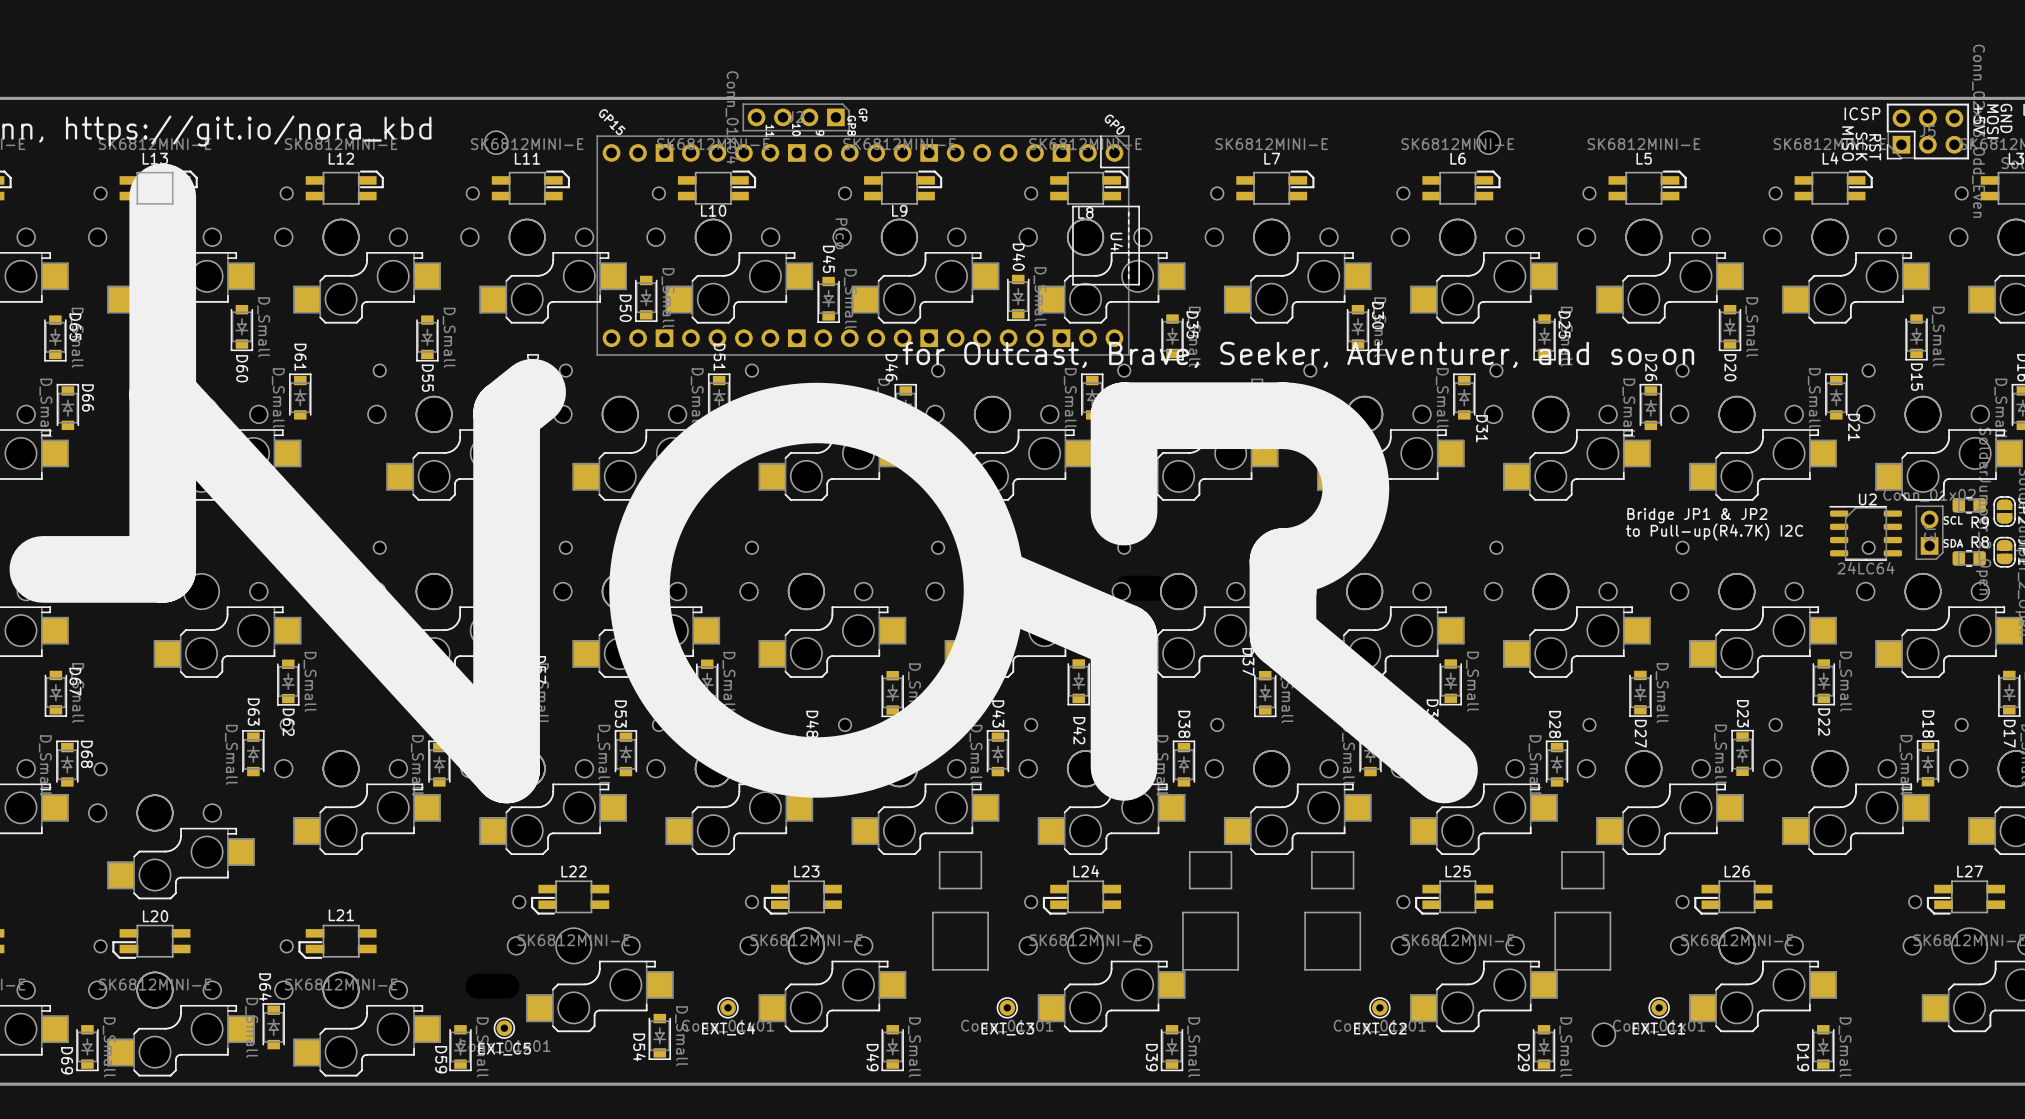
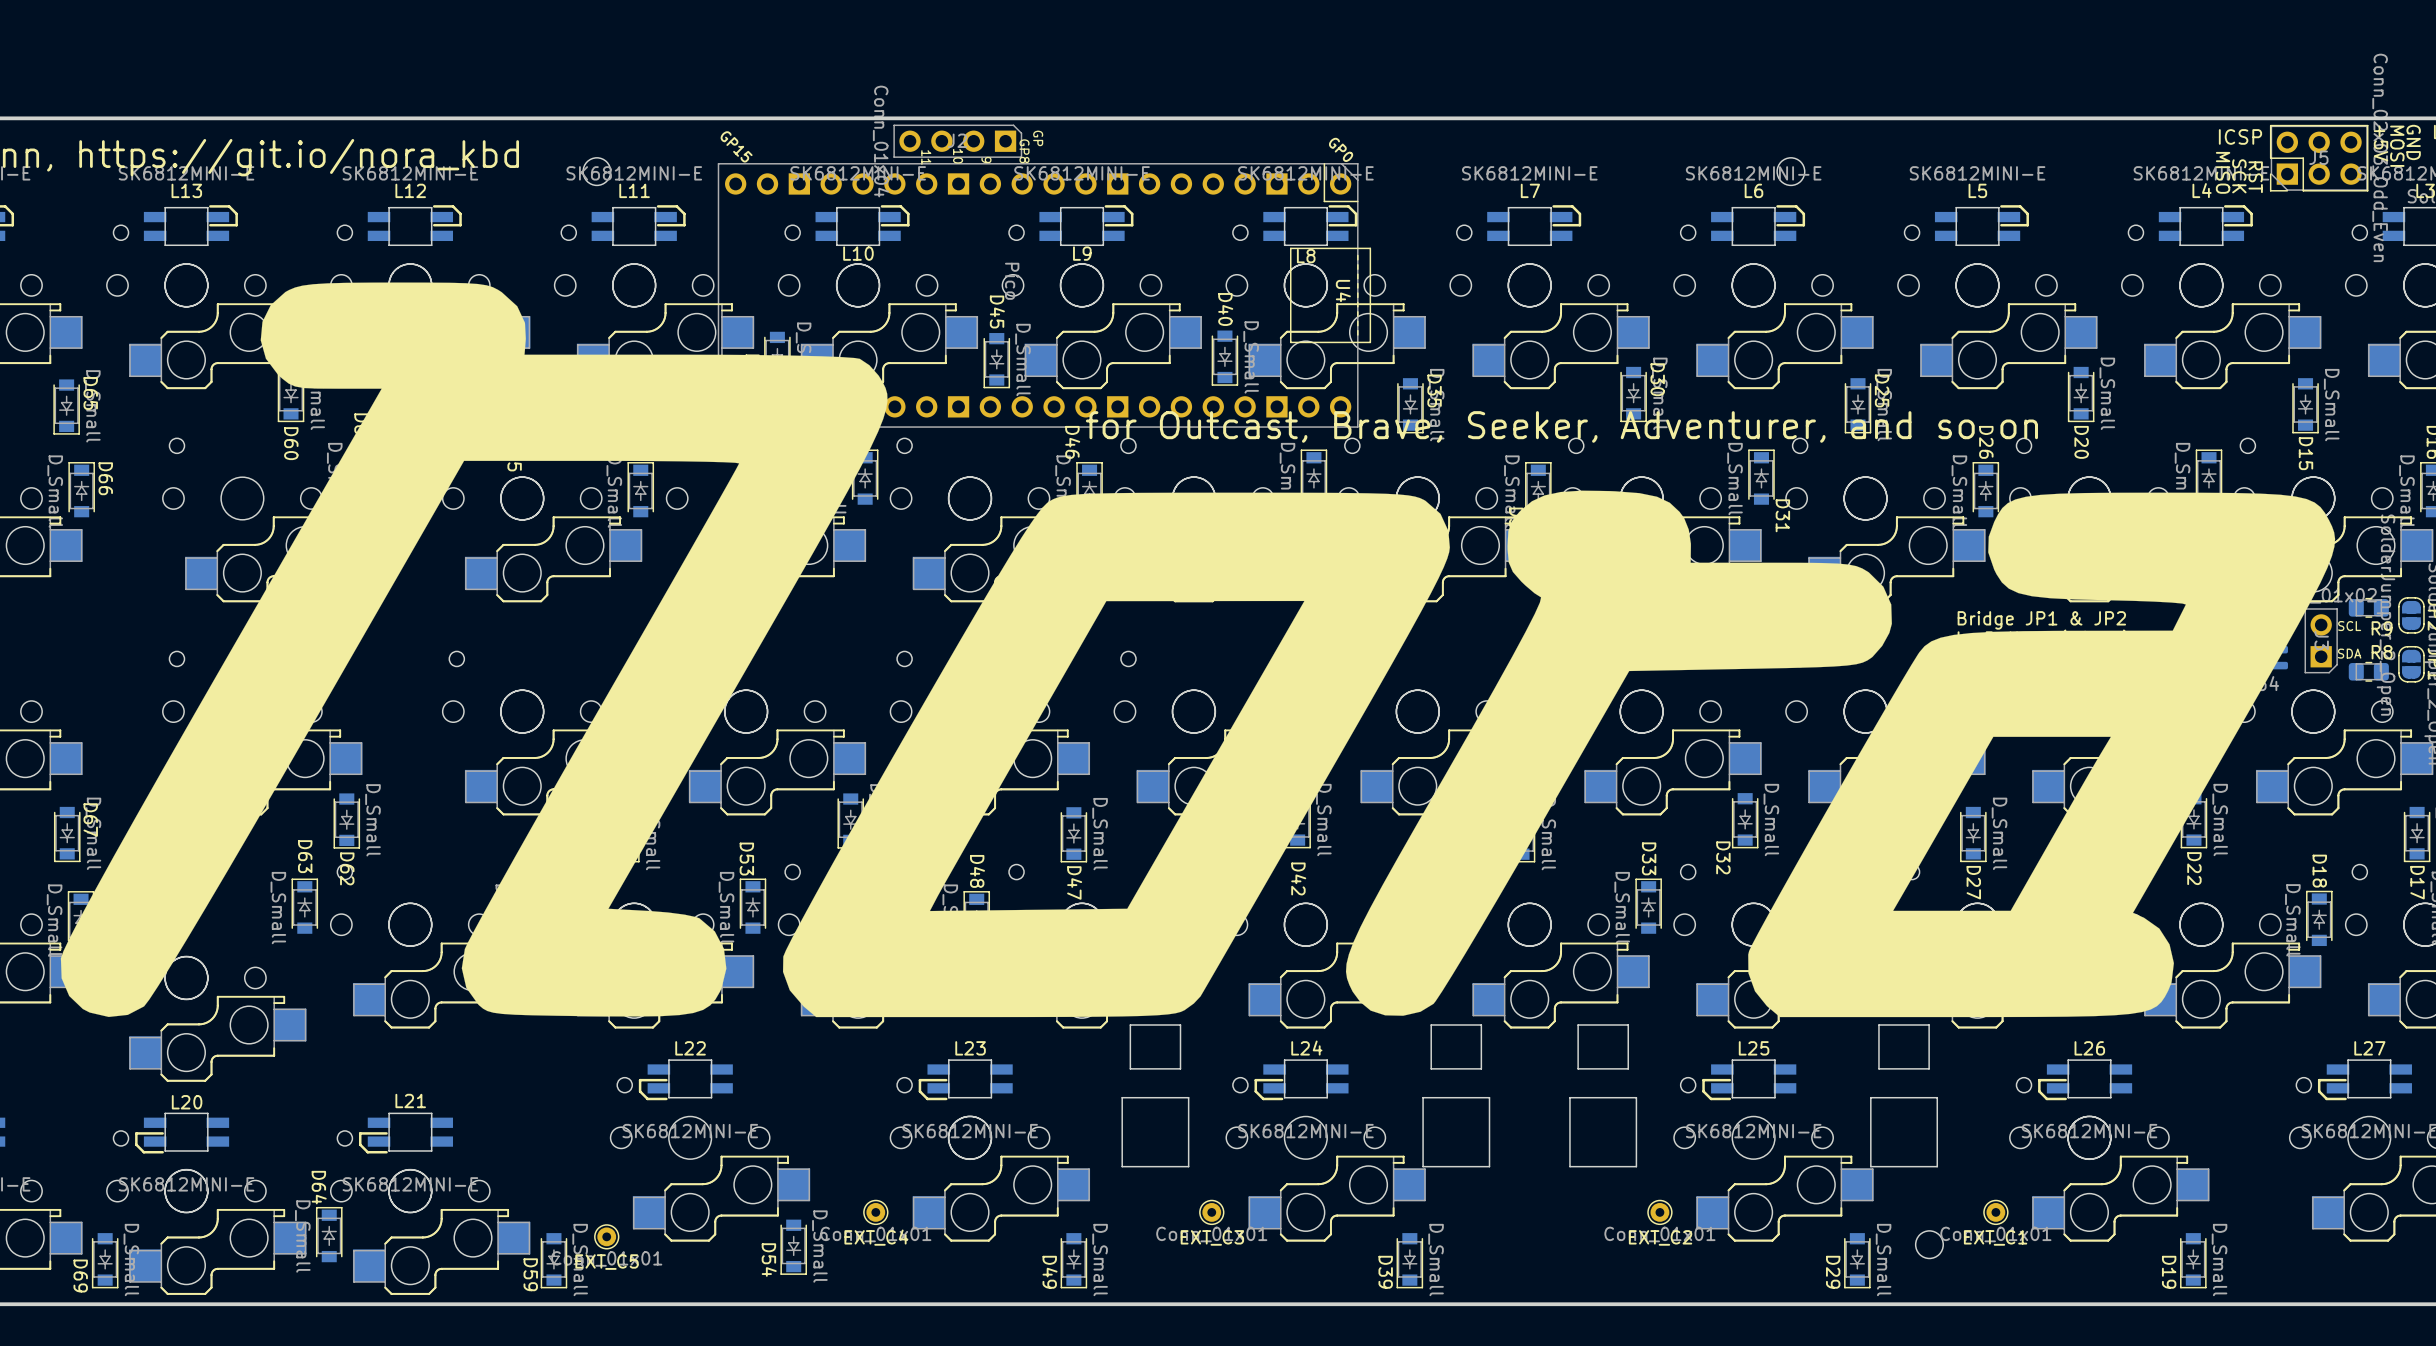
line: (162, 196) (162, 569) (42, 569) -> none
drawing: none -> [60, 282, 2336, 1018]
drawing: [609, 382, 1025, 798] -> none
line: (532, 392) (506, 413) (506, 770) (162, 394) -> none
line: (1124, 512) (1124, 415) (1290, 416) (1310, 421) (1329, 432) (1339, 442) (1350, 460) (1355, 481) (1354, 502) (1347, 523) (1329, 545) (1304, 558) (1282, 561) (1282, 634) (1444, 770) -> none
line: (998, 583) (1124, 637) (1124, 767) -> none

